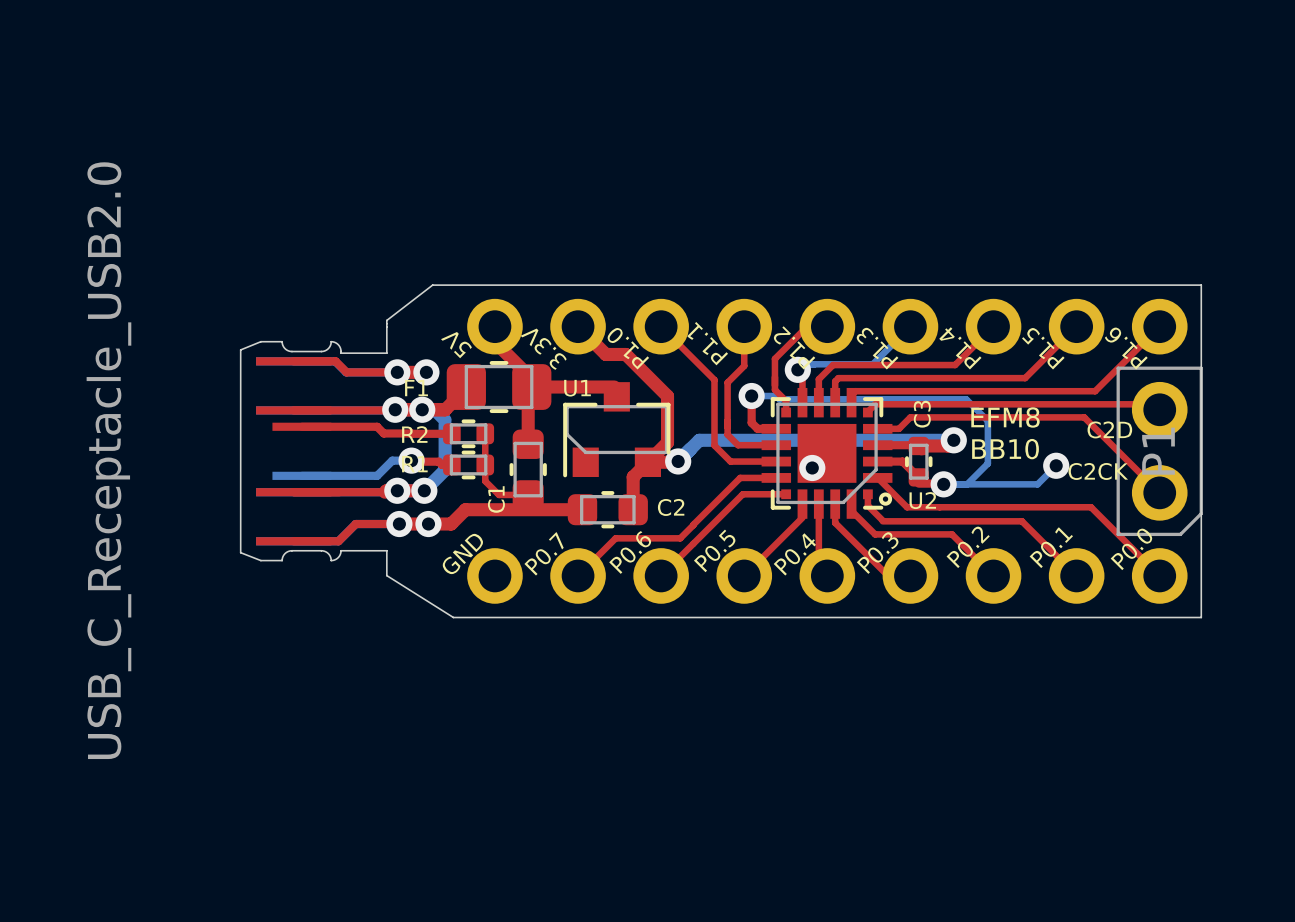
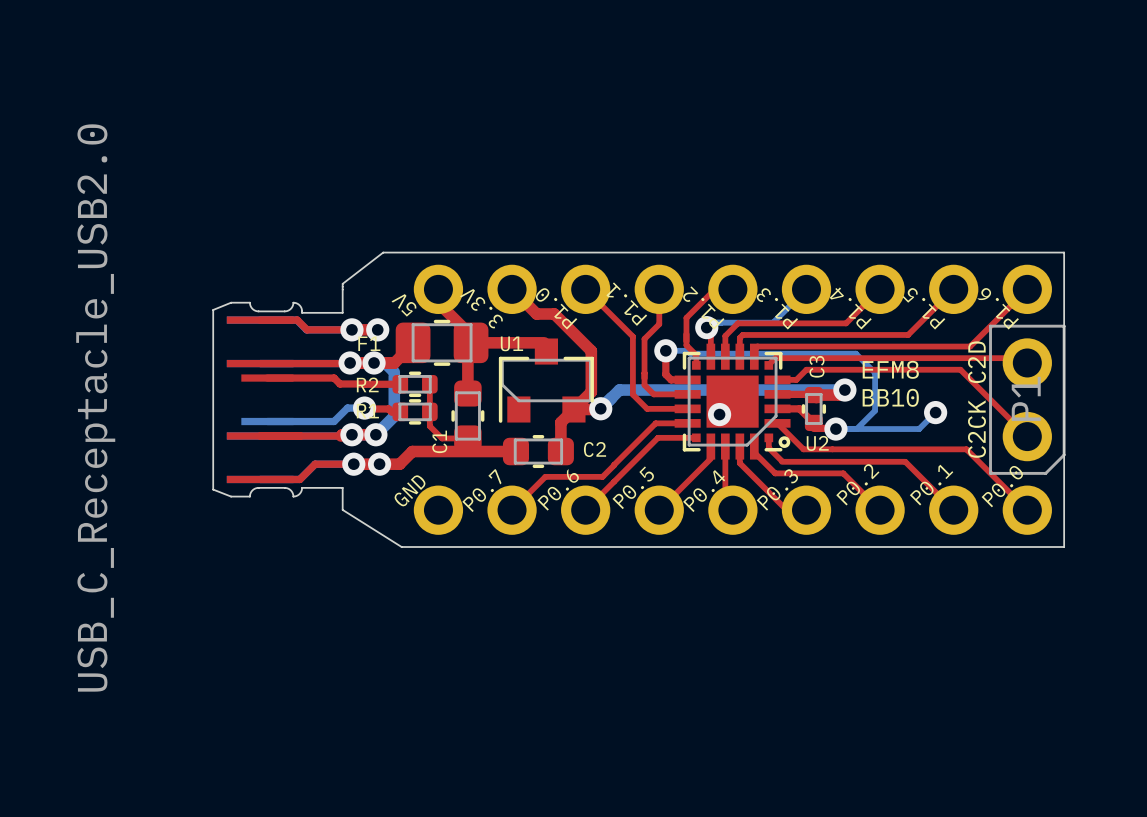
text: C2D (1109, 429) -> none
text: C2CK (1098, 471) -> C2CK C2D (976, 399)

